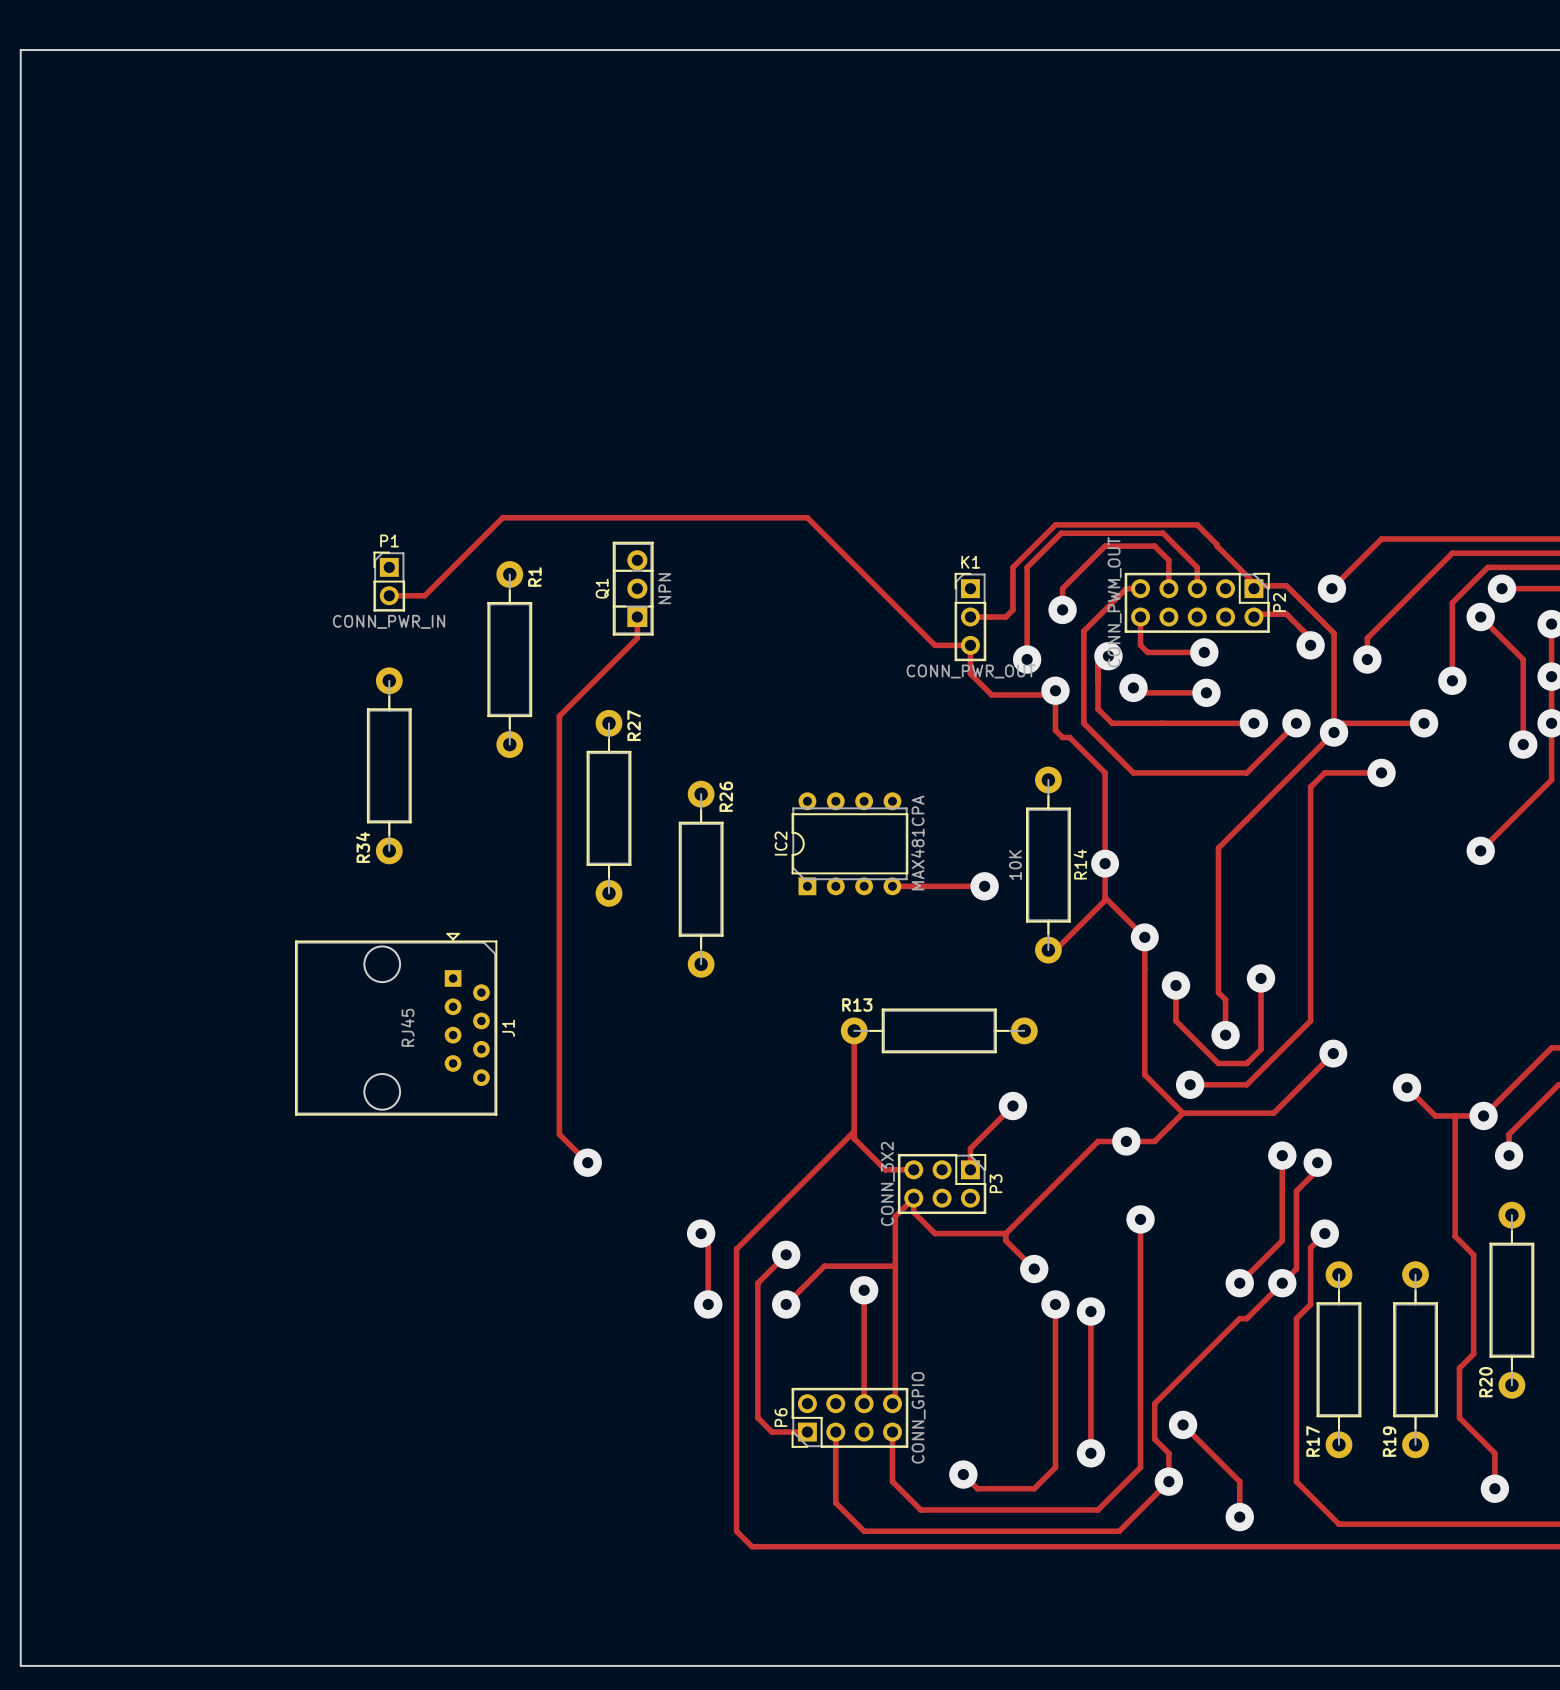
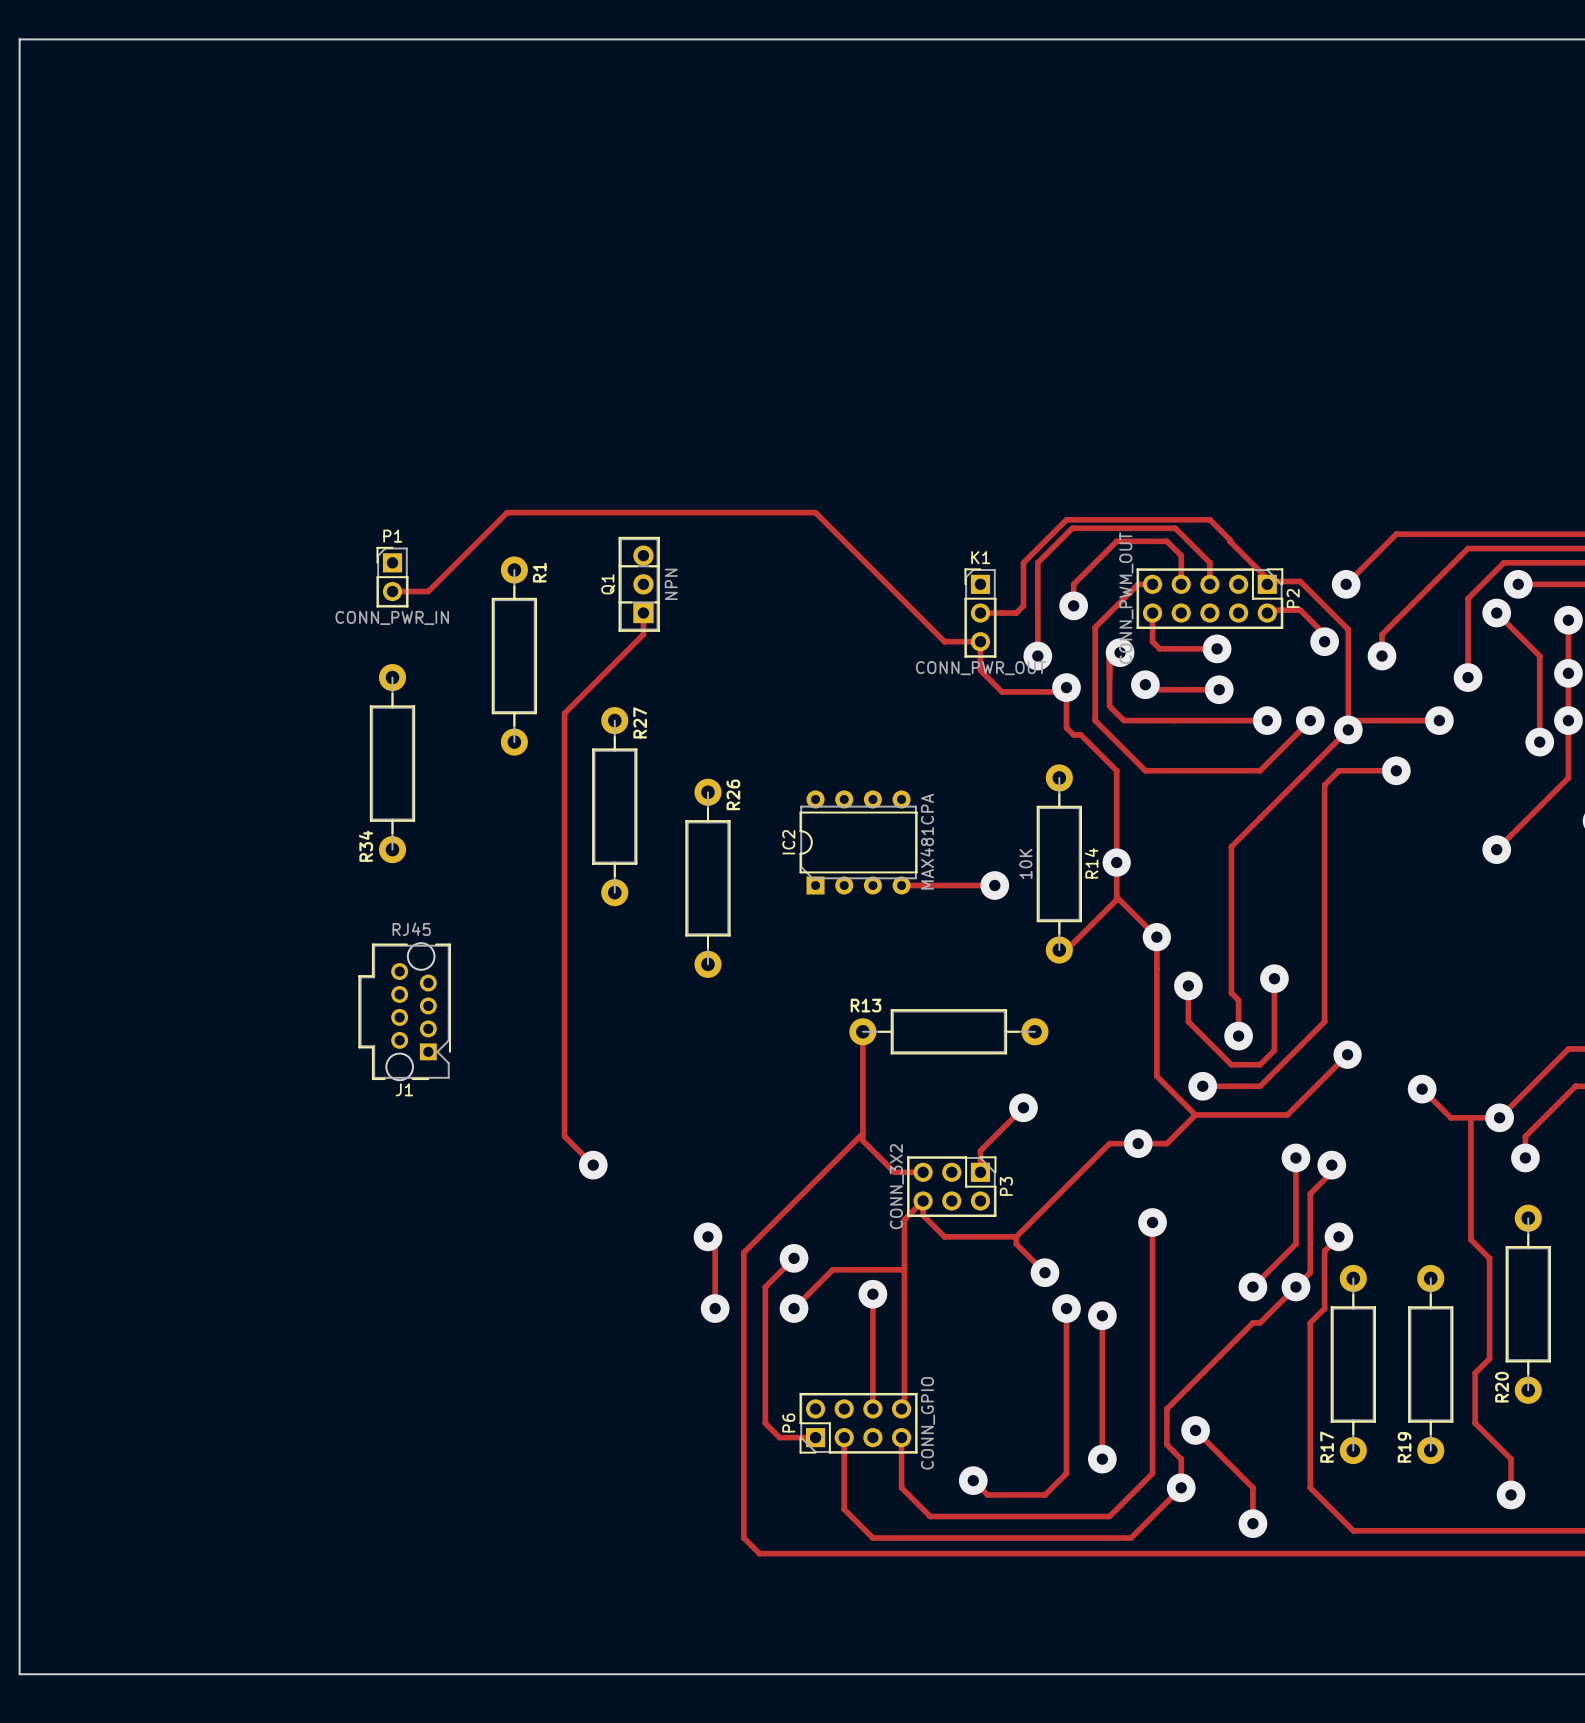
J1 footprint: [295, 933, 498, 1116] -> [358, 943, 451, 1081]
J1 value position: RJ45 (407, 1027) -> RJ45 (411, 929)
J1 name position: J1 (508, 1028) -> J1 (404, 1089)

